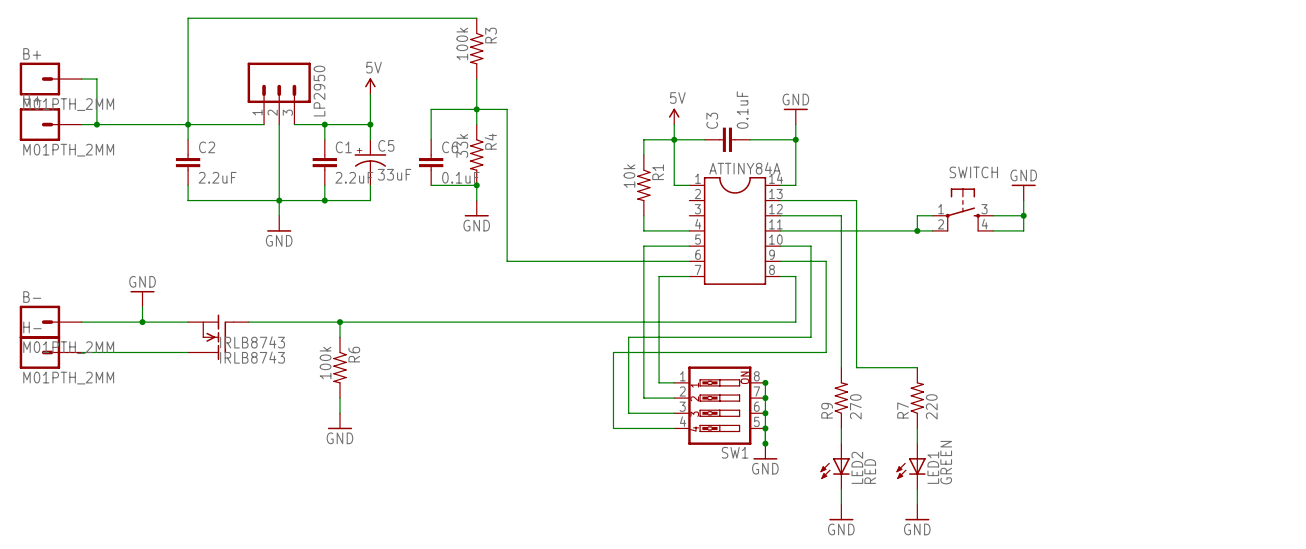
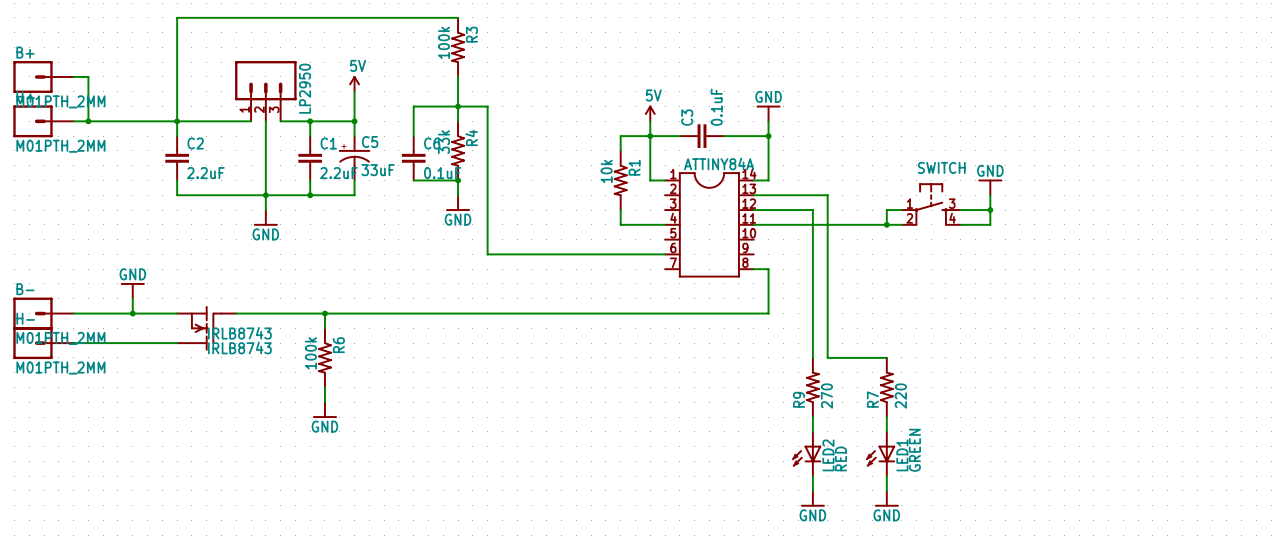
wire: (689, 246) (643, 246) (643, 398) (674, 398) -> none
wire: (780, 246) (810, 246) (810, 337) (628, 337) (628, 413) (674, 413) -> none
wire: (780, 261) (826, 261) (826, 352) (613, 352) (613, 428) (674, 428) -> none
wire: (689, 276) (659, 276) (659, 382) (674, 382) -> none
wire: (765, 382) (765, 443) -> none
junction: (765, 382) -> none
junction: (765, 398) -> none
SW1: (719, 405) -> none
junction: (765, 413) -> none
junction: (765, 428) -> none
junction: (765, 443) -> none
power symbol: GND (765, 451) -> none

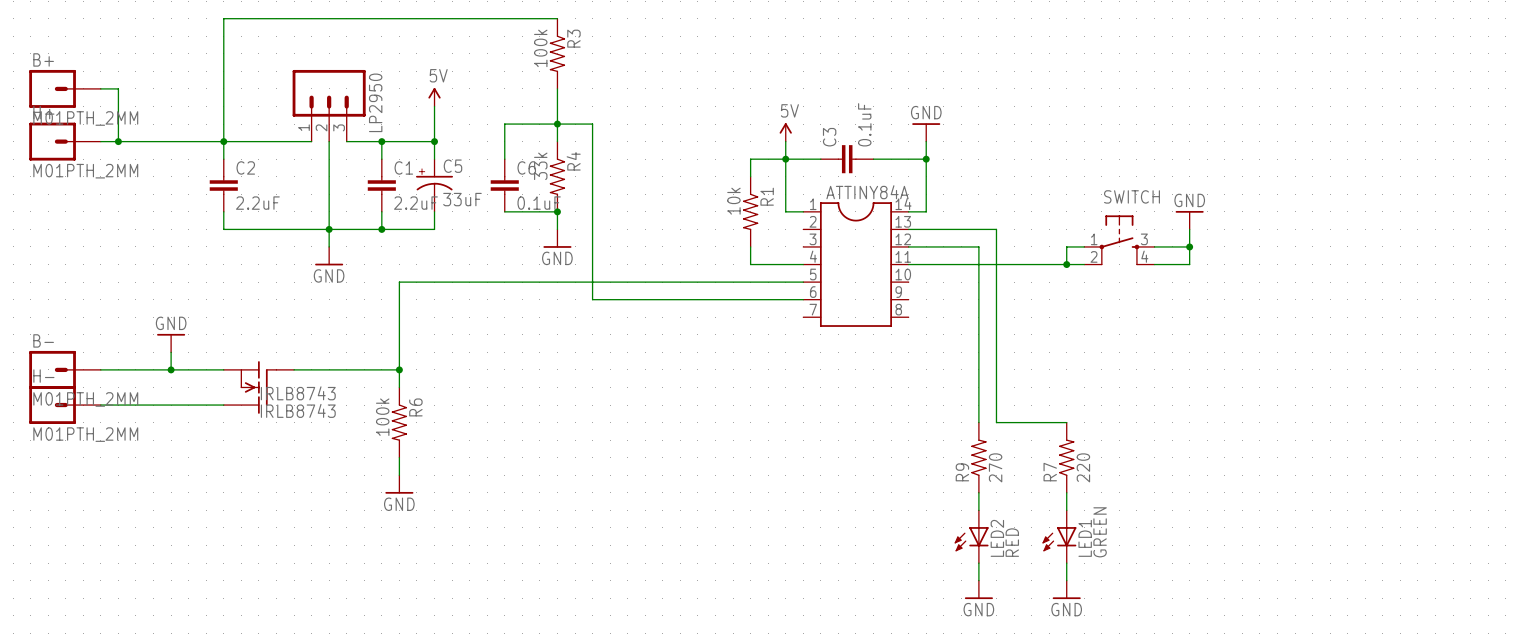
wire: (753, 269) (768, 269) (768, 313) (324, 313) -> (803, 282) (399, 282) (399, 369)

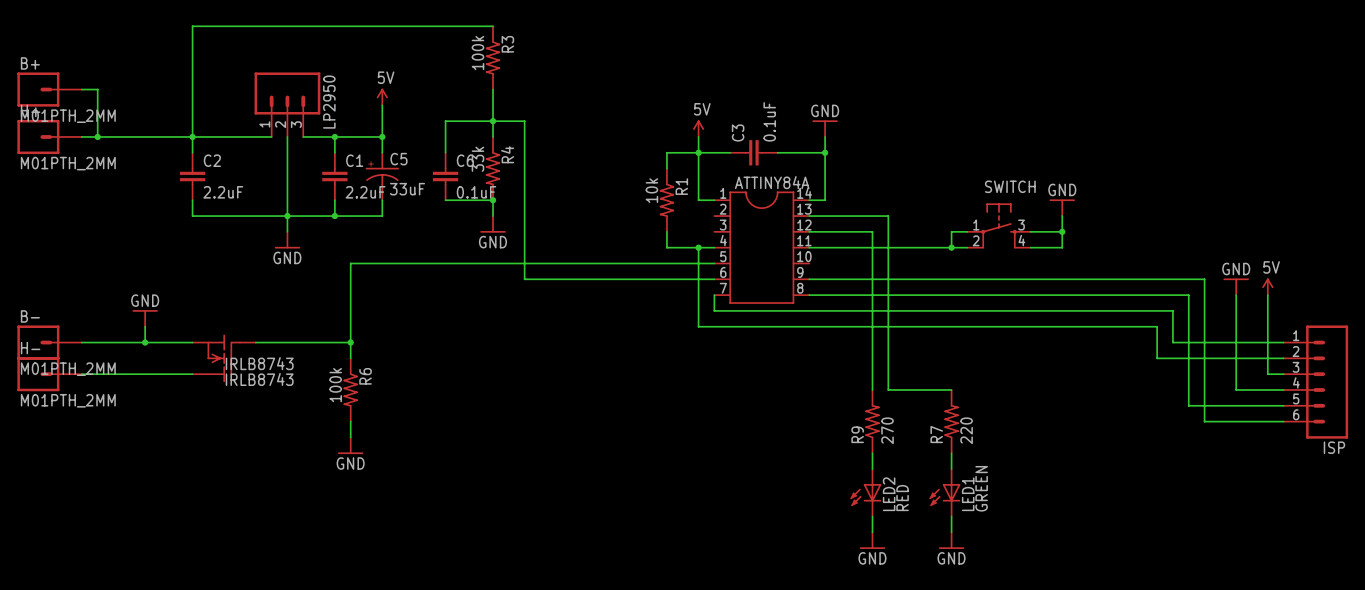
wire: none -> (698, 247) (698, 326) (1157, 326) (1157, 358) (1283, 358)
junction: none -> (698, 247)
wire: none -> (809, 279) (1204, 279) (1204, 421) (1283, 421)
power symbol: none -> GND (1236, 286)
power symbol: none -> 5V (1267, 286)
wire: none -> (714, 295) (714, 310) (1172, 310) (1172, 342) (1283, 342)
wire: none -> (809, 295) (1188, 295) (1188, 405) (1283, 405)
wire: none -> (1236, 295) (1236, 389) (1283, 389)
wire: none -> (1267, 295) (1267, 374) (1283, 374)
ISP: none -> (1315, 382)

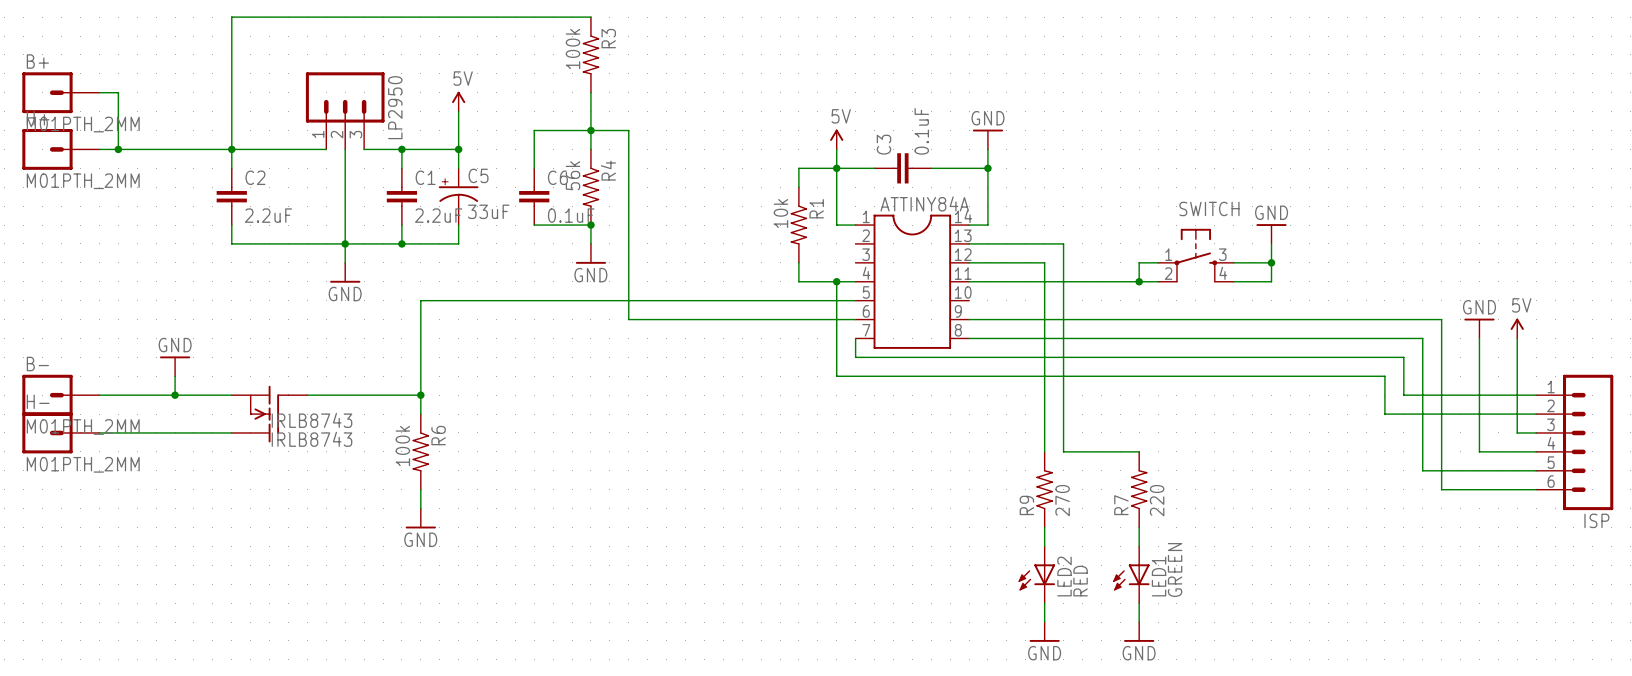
R4 value: 33k (477, 159) -> 56k (573, 175)

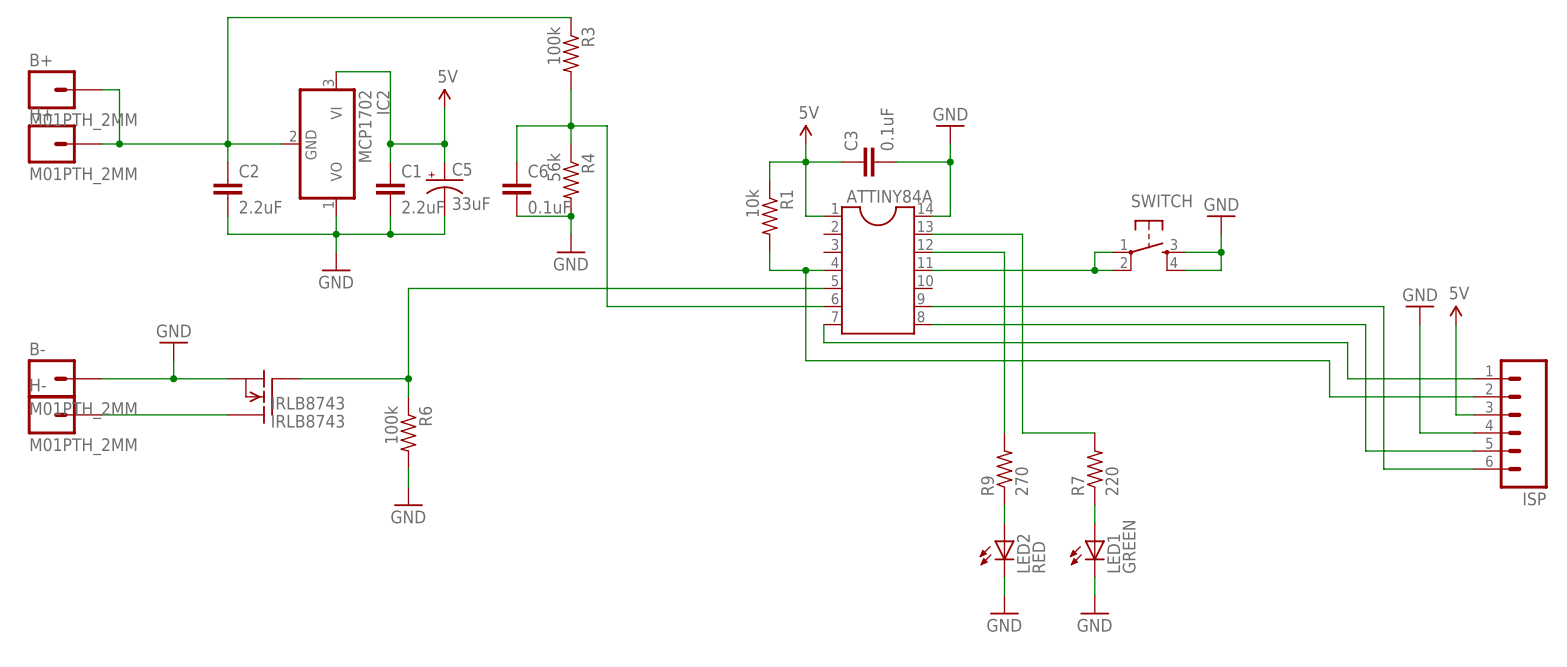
LP2950: (345, 110) -> none
IC2: none -> MCP1702 (318, 143)
wire: (345, 149) (345, 225) -> none
wire: (364, 149) (401, 149) -> (336, 71) (390, 71) (390, 143)

